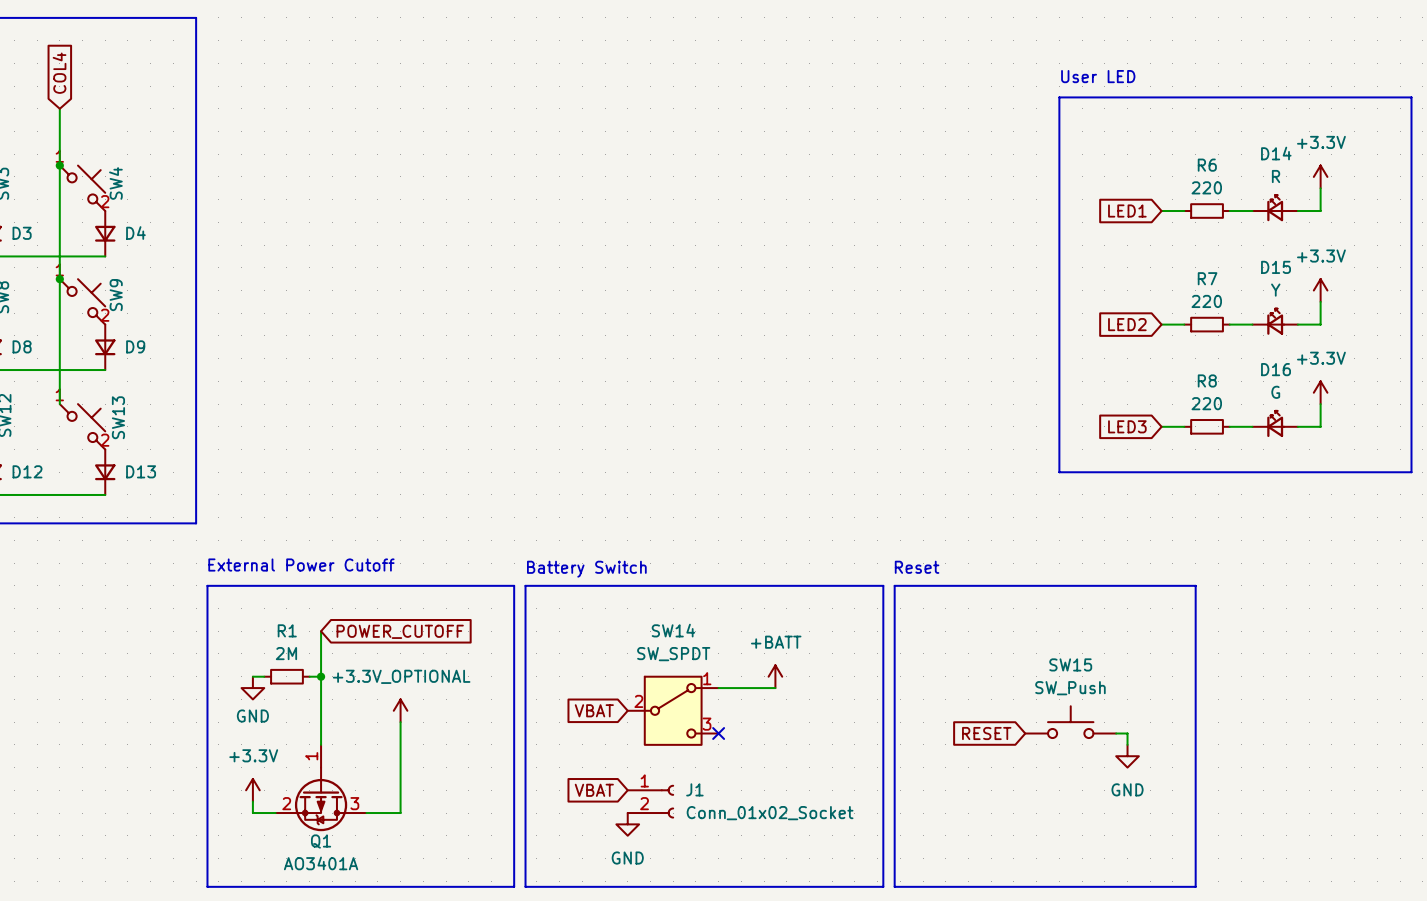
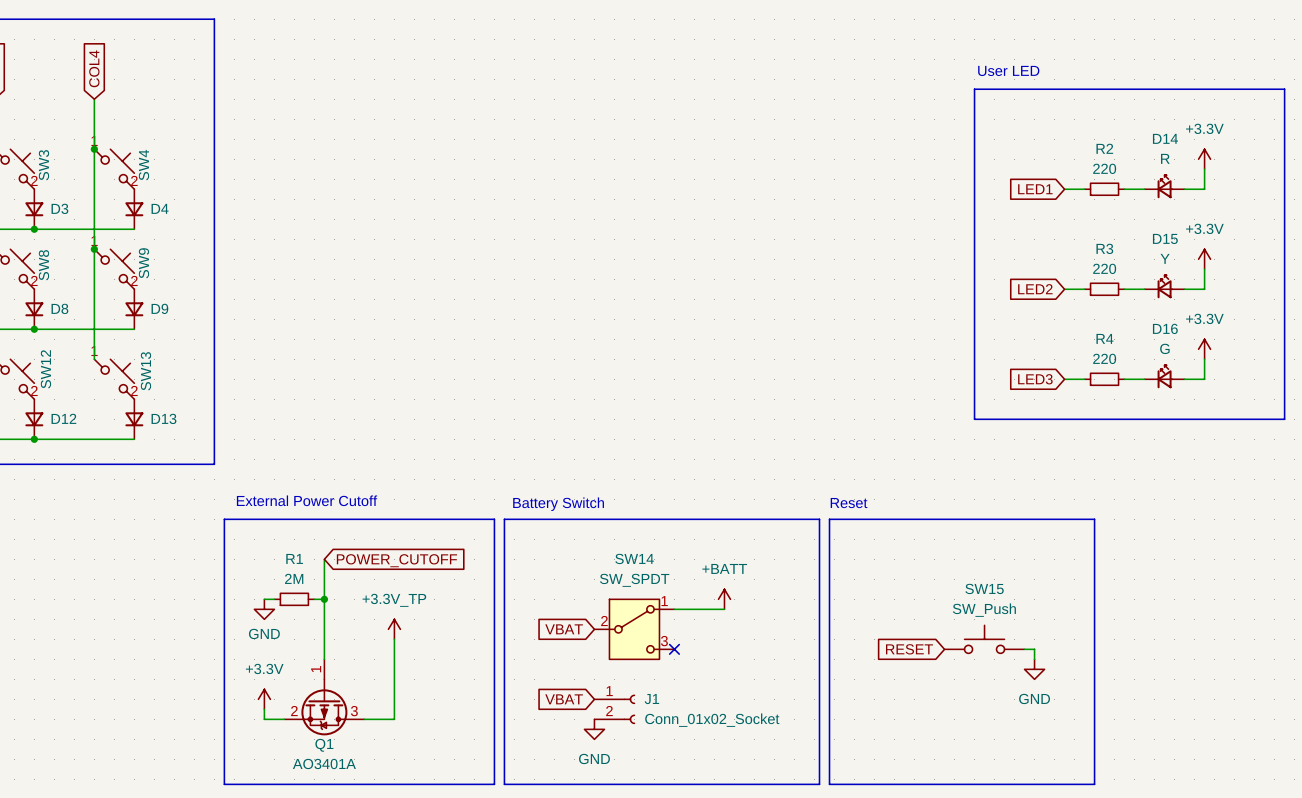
R6 name: R6 (1207, 165) -> R2 (1104, 148)
R7 name: R7 (1207, 278) -> R3 (1104, 248)
R8 name: R8 (1207, 380) -> R4 (1104, 338)
power symbol: +3.3V_OPTIONAL (400, 710) -> +3.3V_TP (394, 629)

